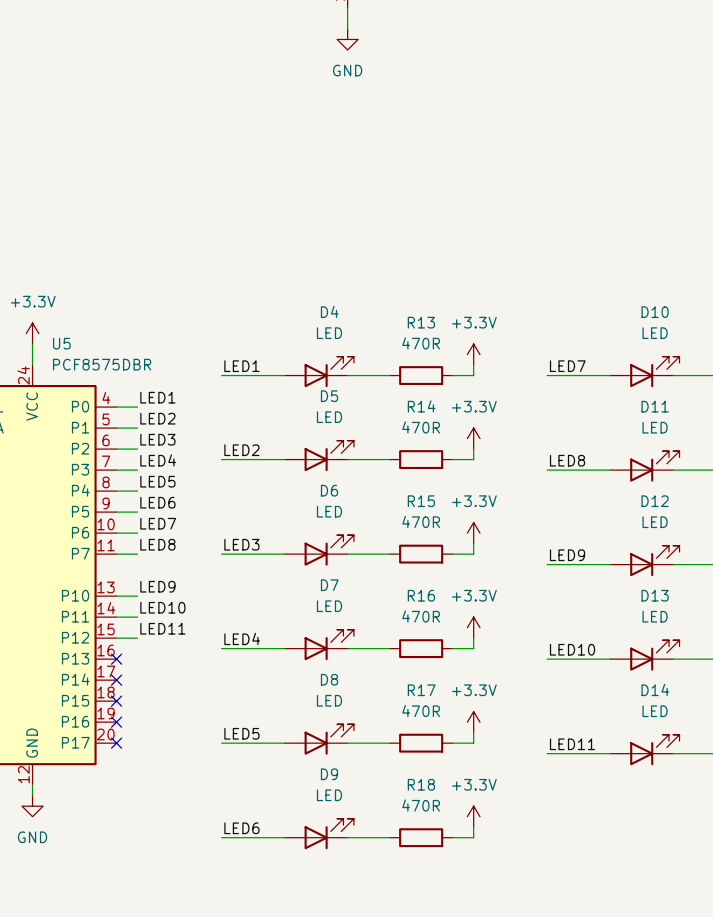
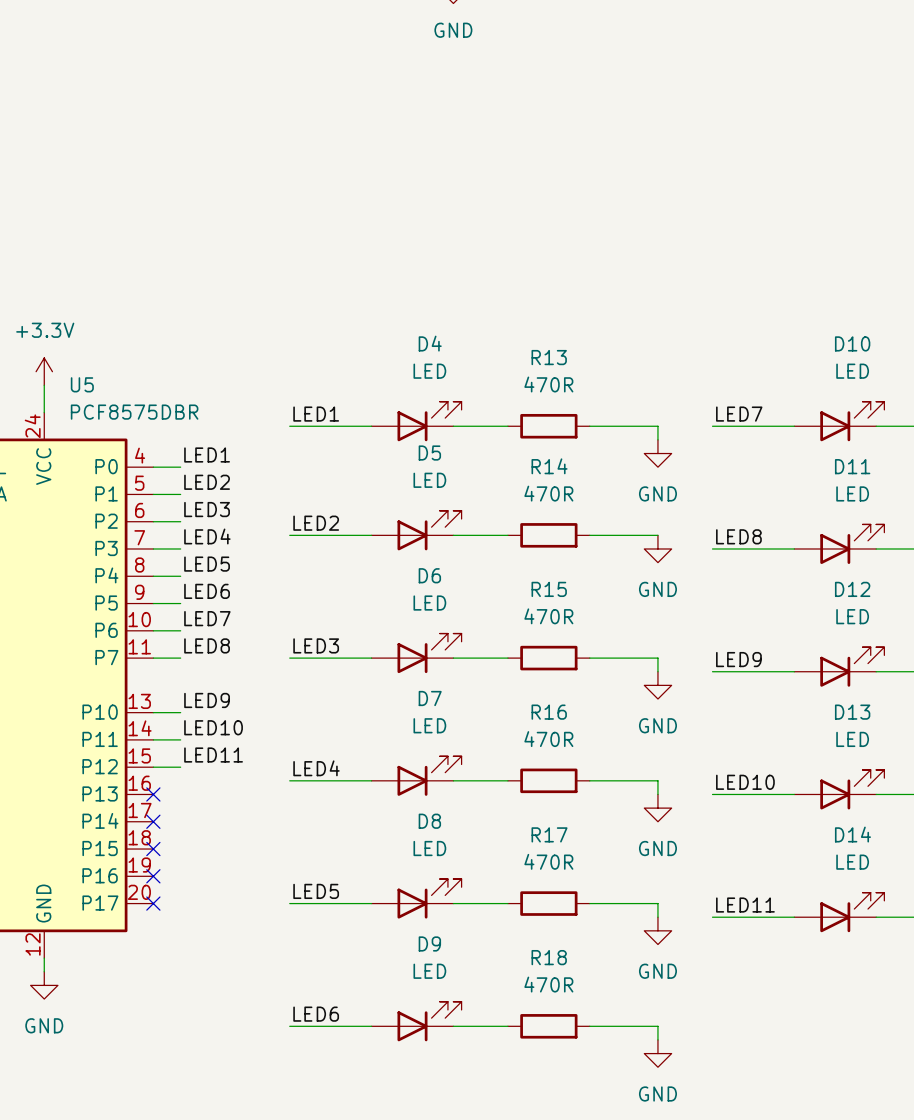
power symbol: +3.3V (473, 354) -> none
wire: (473, 365) (473, 375) -> (657, 439) (657, 426) (617, 426)
power symbol: none -> GND (657, 453)
power symbol: +3.3V (473, 438) -> none
wire: (473, 449) (473, 459) -> (657, 535) (617, 535)
power symbol: none -> GND (657, 548)
power symbol: +3.3V (473, 533) -> none
wire: (473, 543) (473, 554) -> (657, 671) (657, 658) (617, 658)
power symbol: none -> GND (657, 685)
power symbol: +3.3V (473, 627) -> none
wire: (473, 638) (473, 648) -> (657, 794) (657, 780) (617, 780)
power symbol: none -> GND (657, 808)
power symbol: +3.3V (473, 722) -> none
wire: (473, 732) (473, 743) -> (657, 917) (657, 903) (617, 903)
power symbol: none -> GND (657, 930)
power symbol: +3.3V (473, 816) -> none
wire: (473, 827) (473, 837) -> (657, 1039) (657, 1026) (617, 1026)
power symbol: none -> GND (657, 1053)

